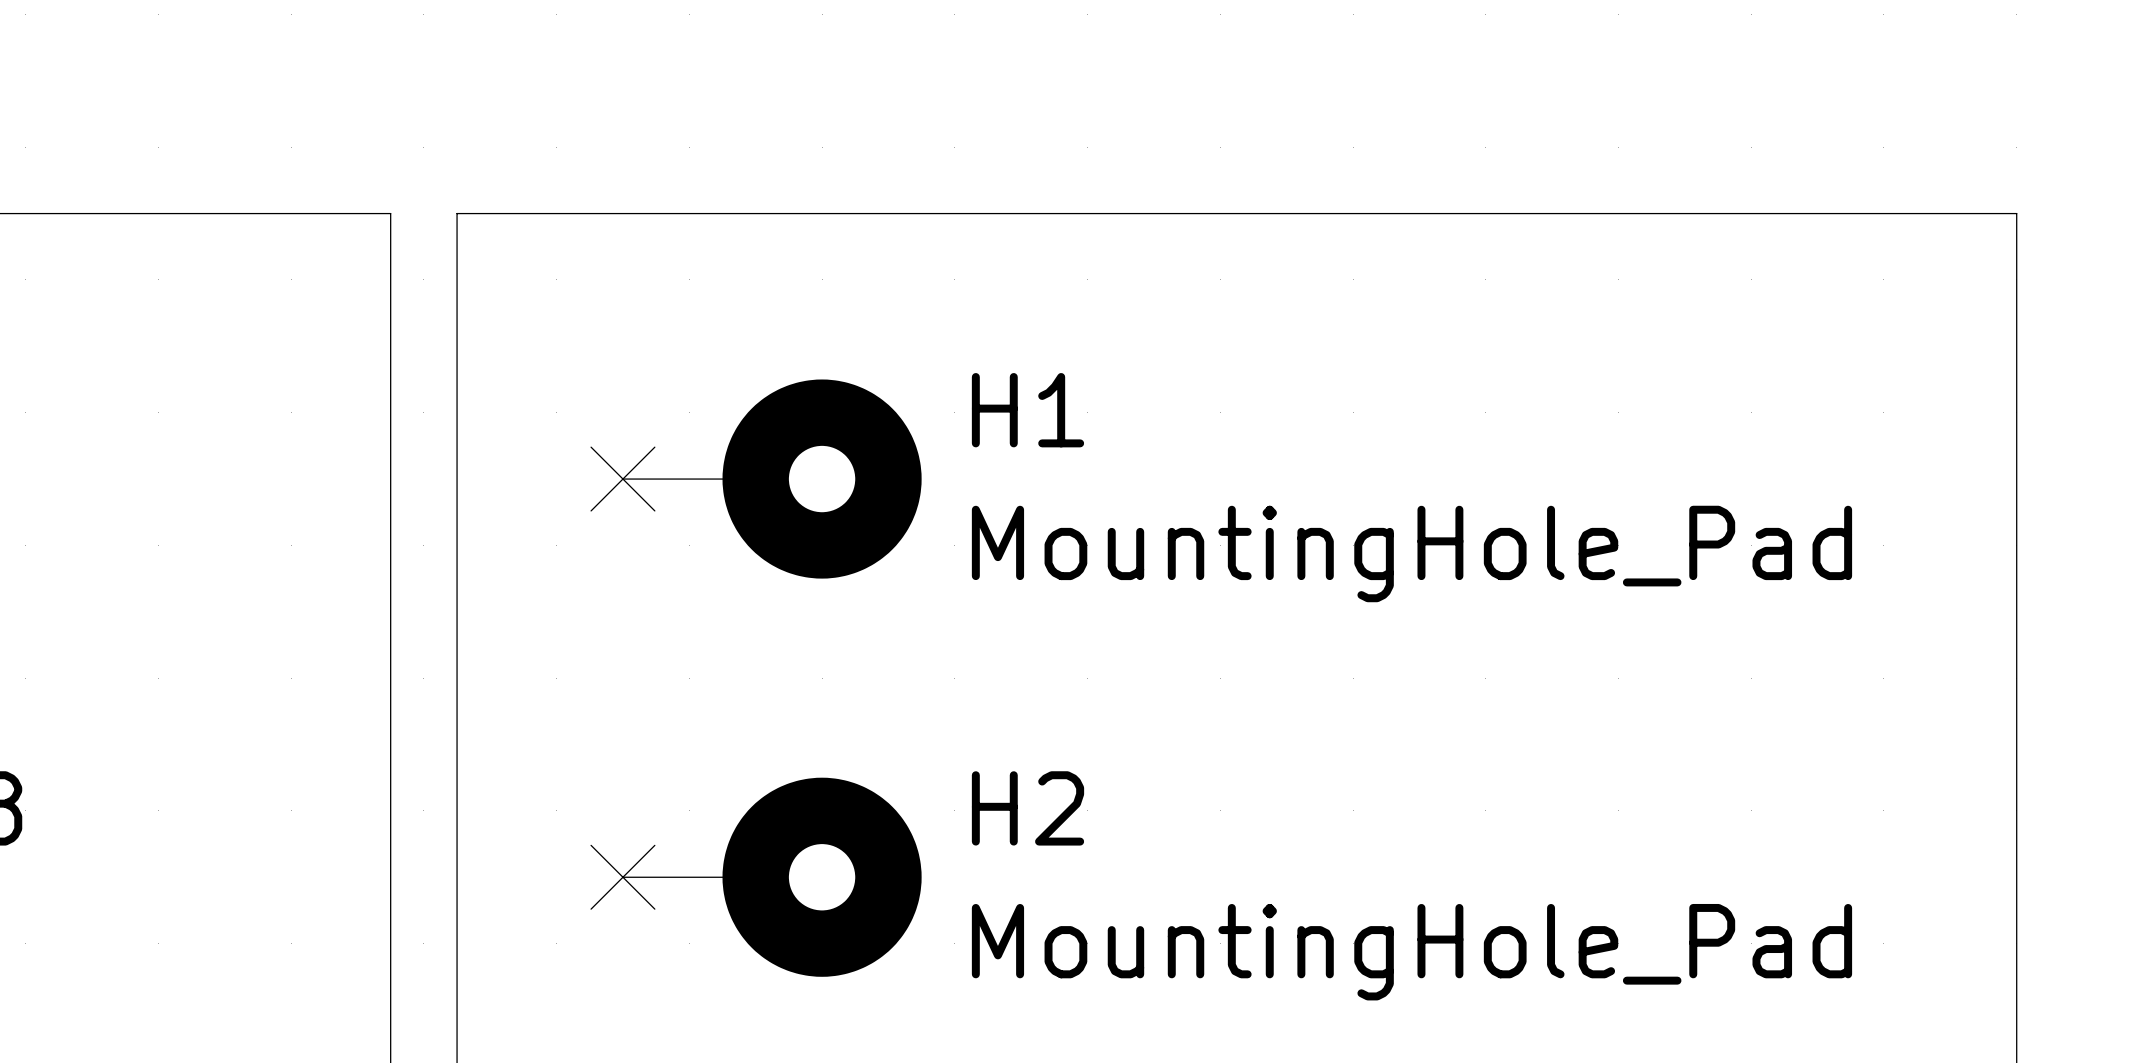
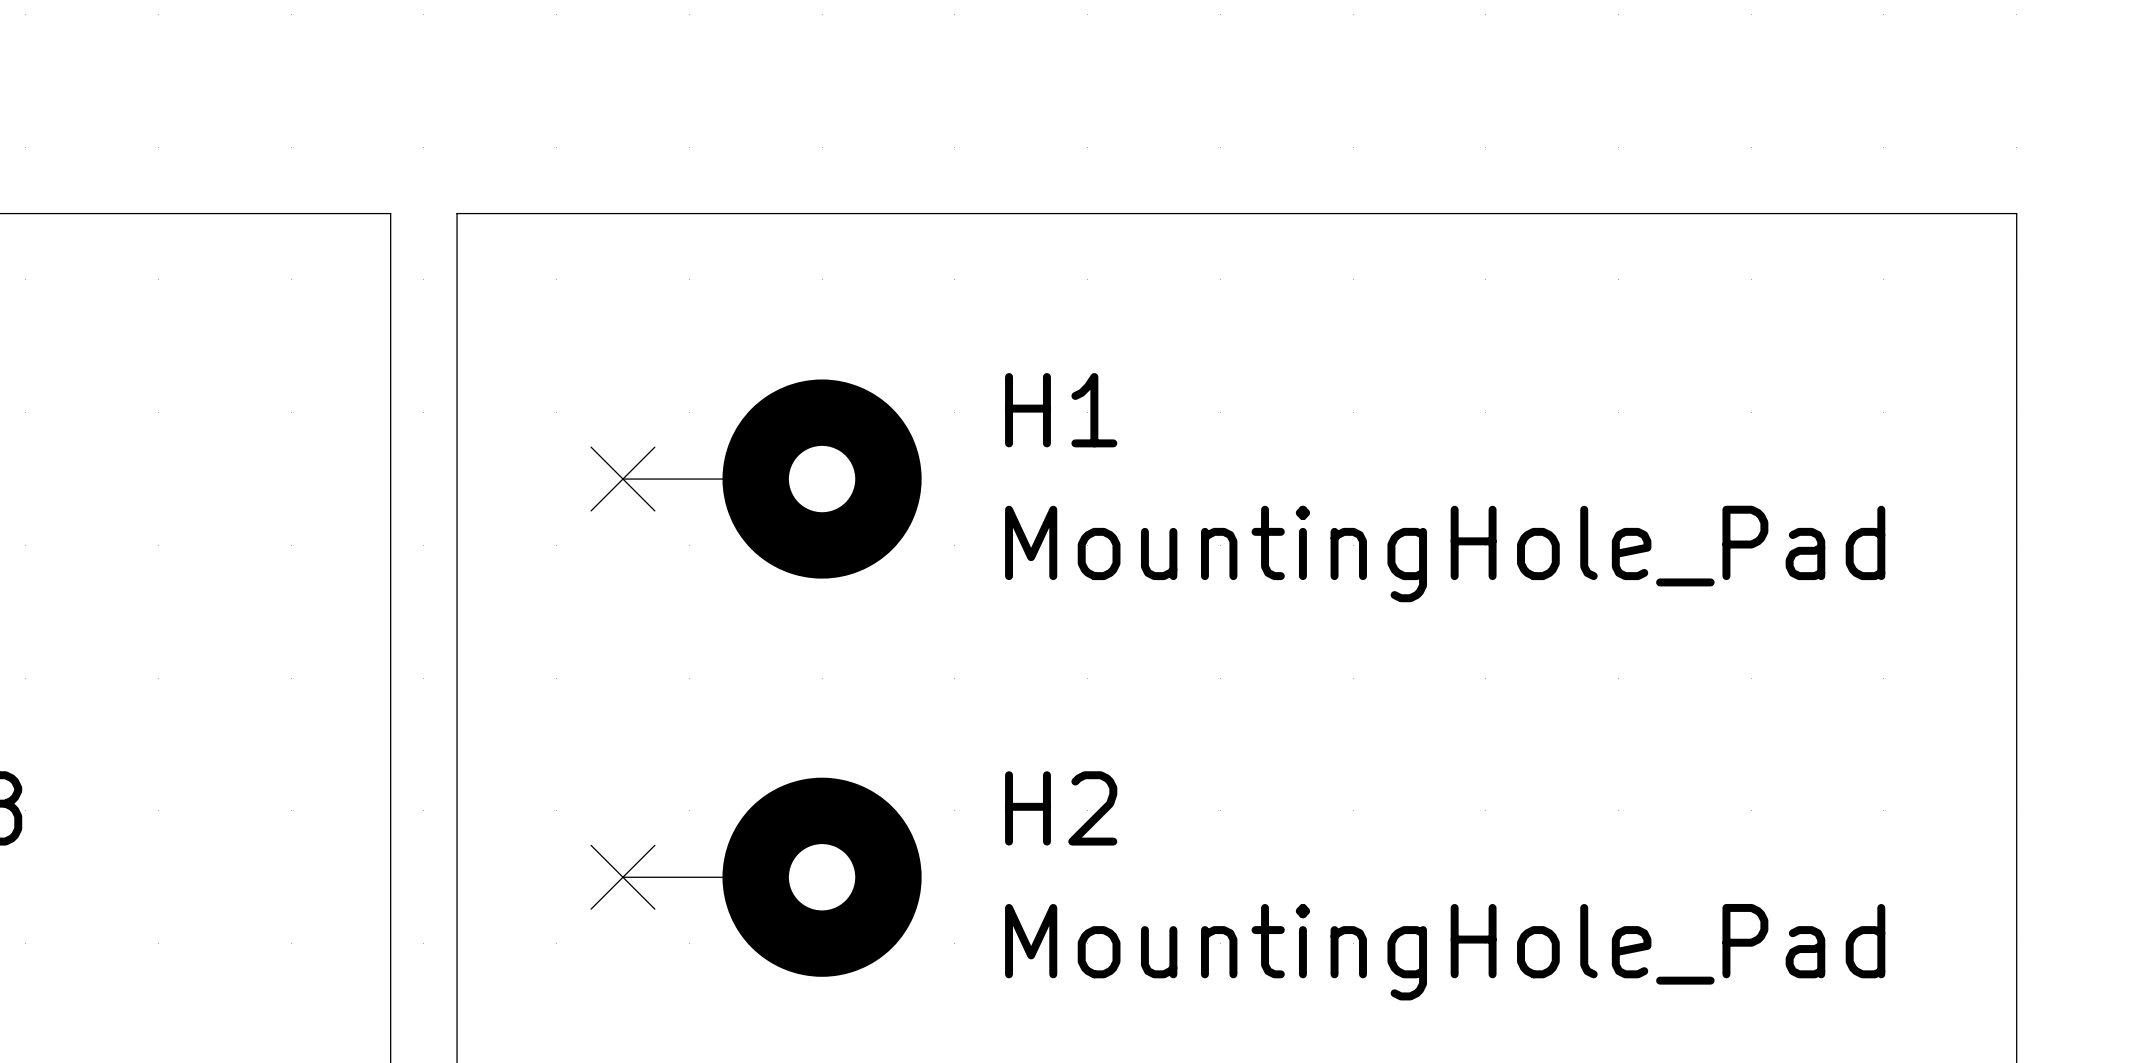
H1 name position: H1 (1027, 410) -> H1 (1061, 410)
H1 value position: MountingHole_Pad (1411, 553) -> MountingHole_Pad (1445, 553)
H2 name position: H2 (1027, 808) -> H2 (1061, 808)
H2 value position: MountingHole_Pad (1411, 952) -> MountingHole_Pad (1445, 952)

